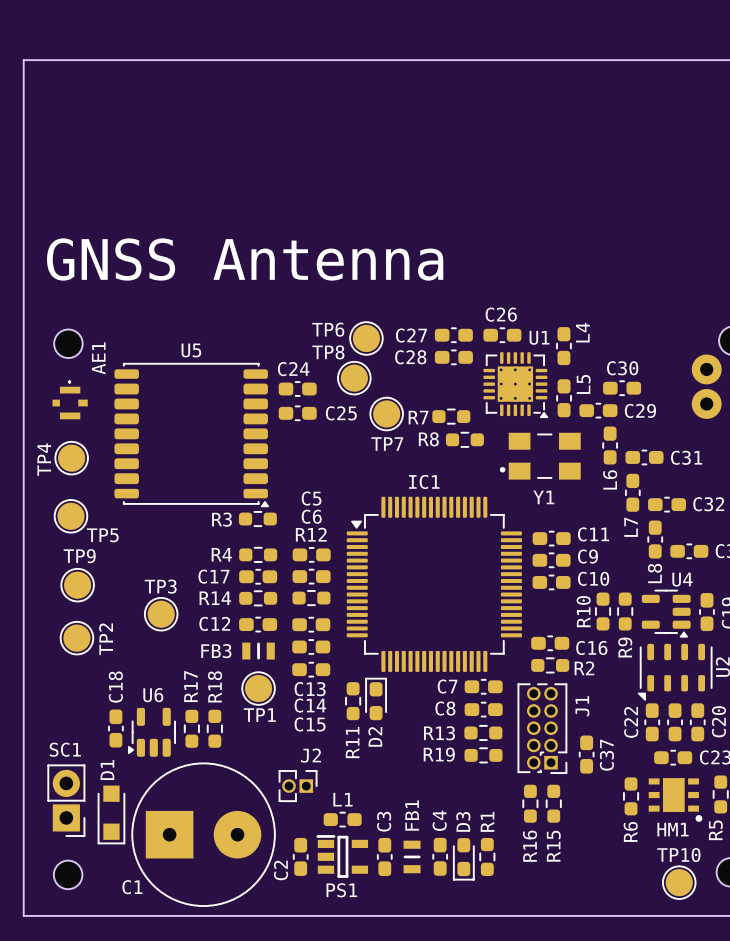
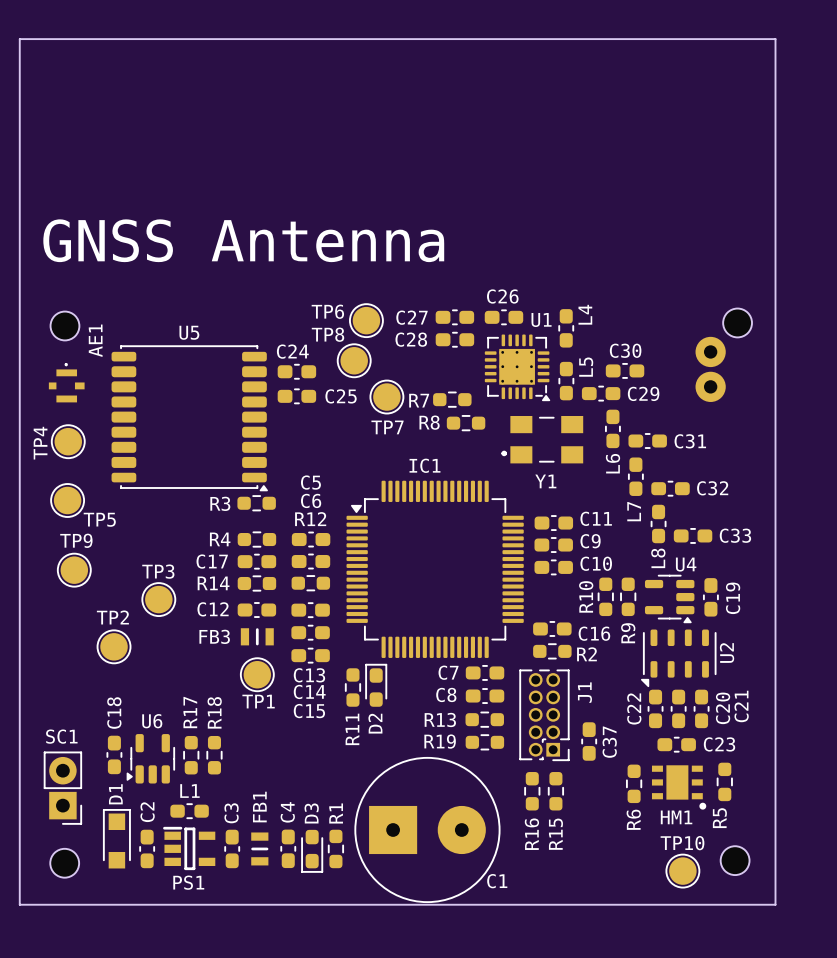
TP2 position: (76, 638) -> (114, 646)
TP2 name rotation: 0° (106, 639) -> 90° clockwise (112, 617)
C18 position: (115, 728) -> (114, 754)
R17 position: (191, 728) -> (191, 755)
R18 position: (214, 728) -> (214, 755)
U6 position: (151, 732) -> (150, 758)
J2: (298, 786) -> none
D1 rotation: 0° (111, 814) -> 180° (116, 838)
D1 position: (111, 814) -> (116, 838)
L1 position: (342, 819) -> (189, 811)
C1 position: (203, 834) -> (427, 830)
C2 position: (300, 856) -> (147, 848)
PS1 position: (342, 856) -> (189, 848)
C3 position: (384, 856) -> (232, 848)
FB1 position: (412, 856) -> (259, 848)
C4 position: (440, 856) -> (288, 848)
R1 position: (487, 856) -> (335, 848)
D3 position: (463, 859) -> (312, 851)
C2 name position: C2 (281, 870) -> C2 (147, 812)
C1 name position: C1 (132, 887) -> C1 (497, 881)

